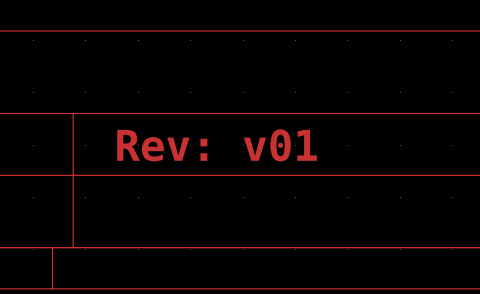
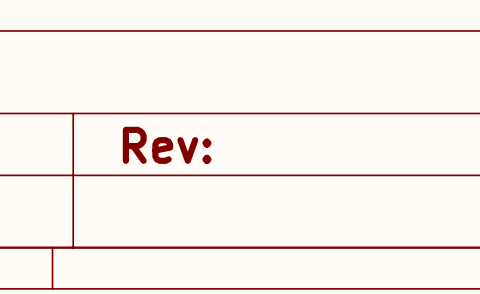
title block: Rev: v01 (217, 145) -> Rev: (167, 145)

